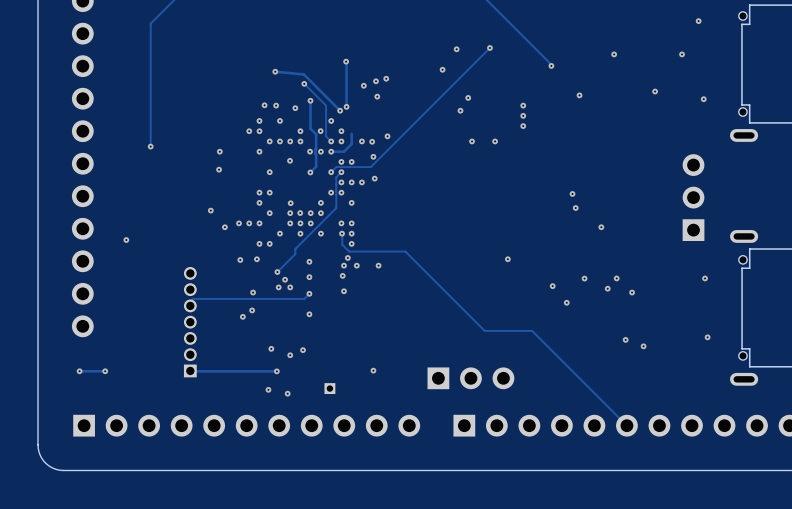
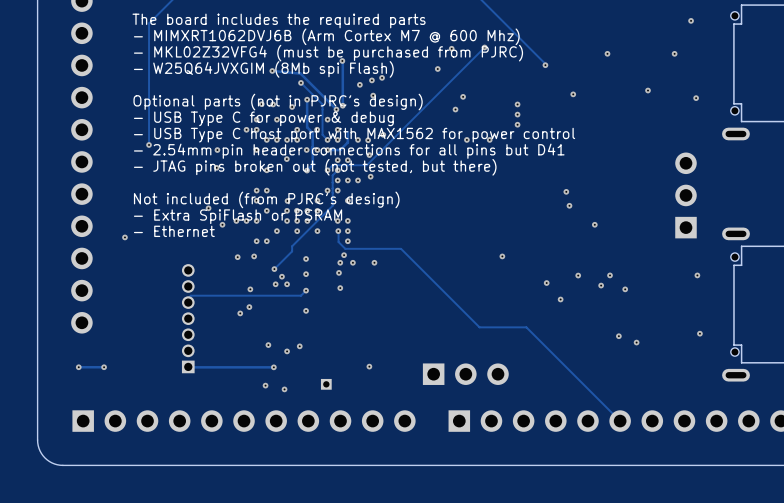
text: none -> The board includes the required parts (279, 20)
text: none -> - MIMXRT1062DVJ6B (Arm Cortex M7 @ 600 Mhz) (326, 36)
text: none -> - MKL02Z32VFG4 (must be purchased from PJRC) (328, 53)
text: none -> - W25Q64JVXGIM (8Mb spi Flash) (263, 69)
text: none -> Optional parts (not in PJRC's design) (278, 102)
text: none -> - USB Type C for power & debug (263, 118)
text: none -> - USB Type C host port with MAX1562 for power control (354, 135)
text: none -> - 2.54mm pin header connections for all pins but D41 (349, 151)
text: none -> - JTAG pins broken out (not tested, but there) (315, 167)
text: none -> Not included (from PJRC's design) (266, 199)
text: none -> - Extra SpiFlash or PSRAM (238, 216)
text: none -> - Ethernet (174, 231)

